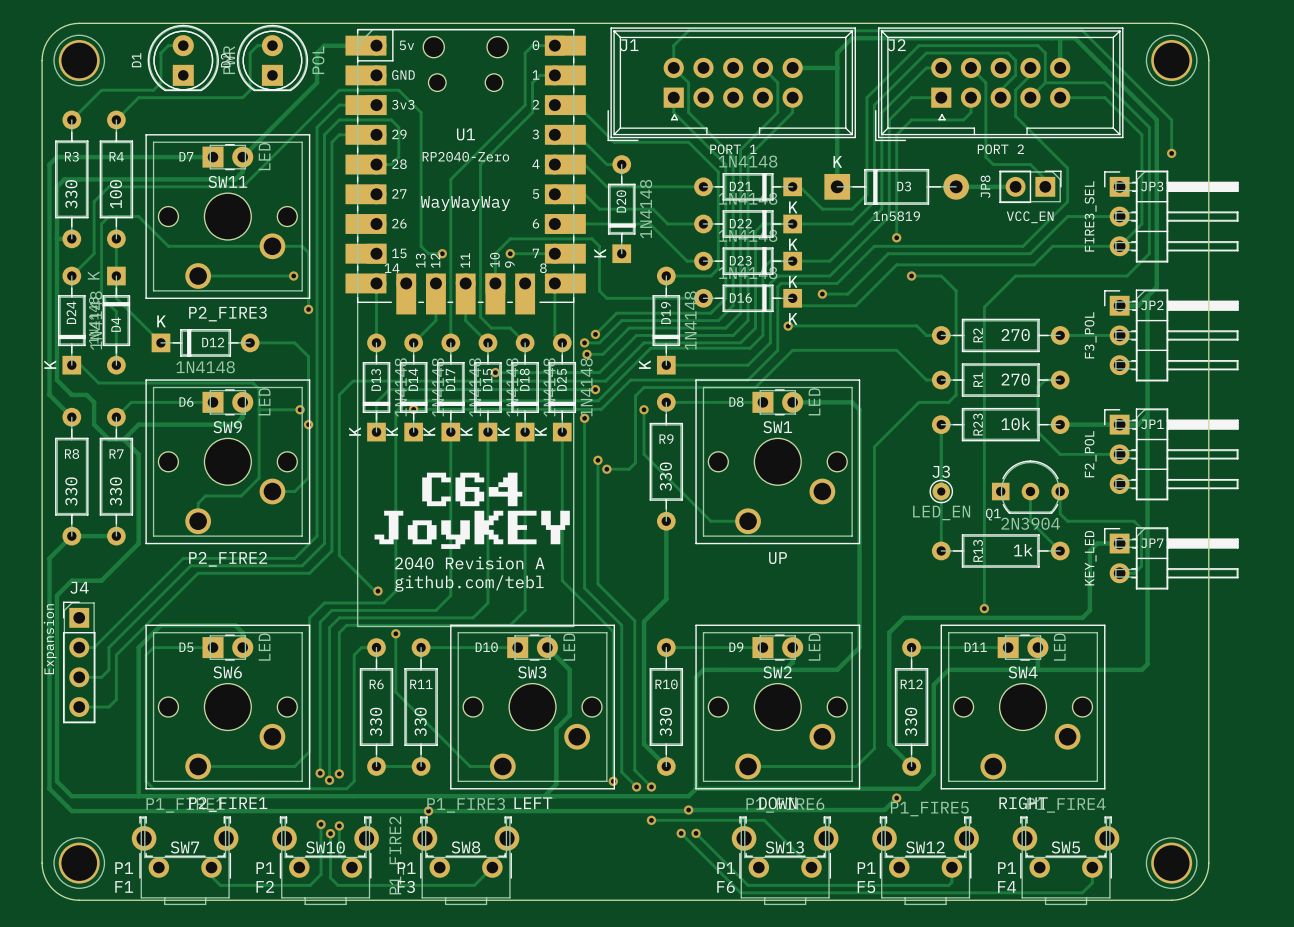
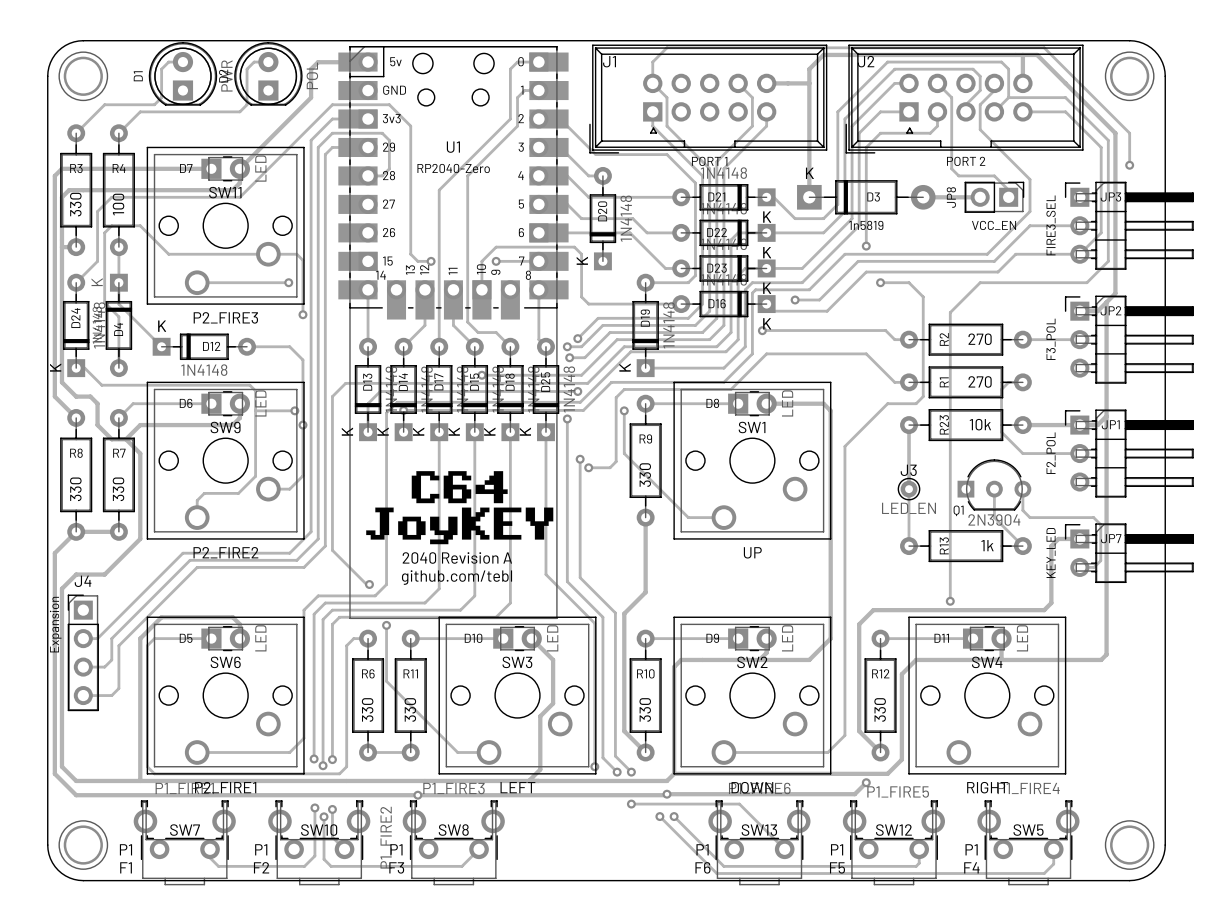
text: WayWayWay (465, 203) -> none

